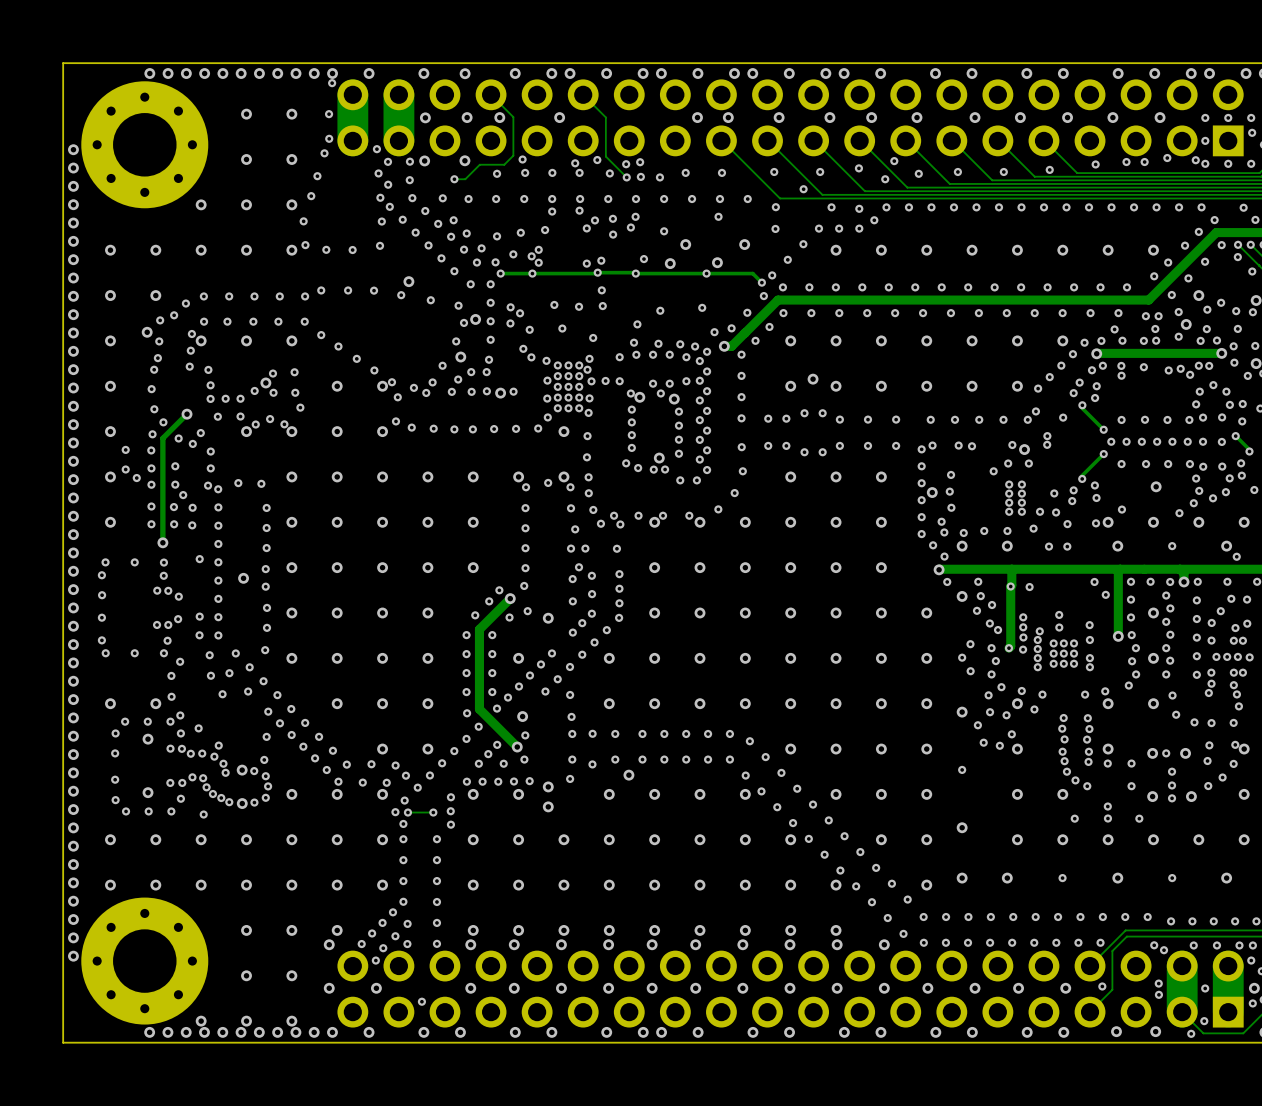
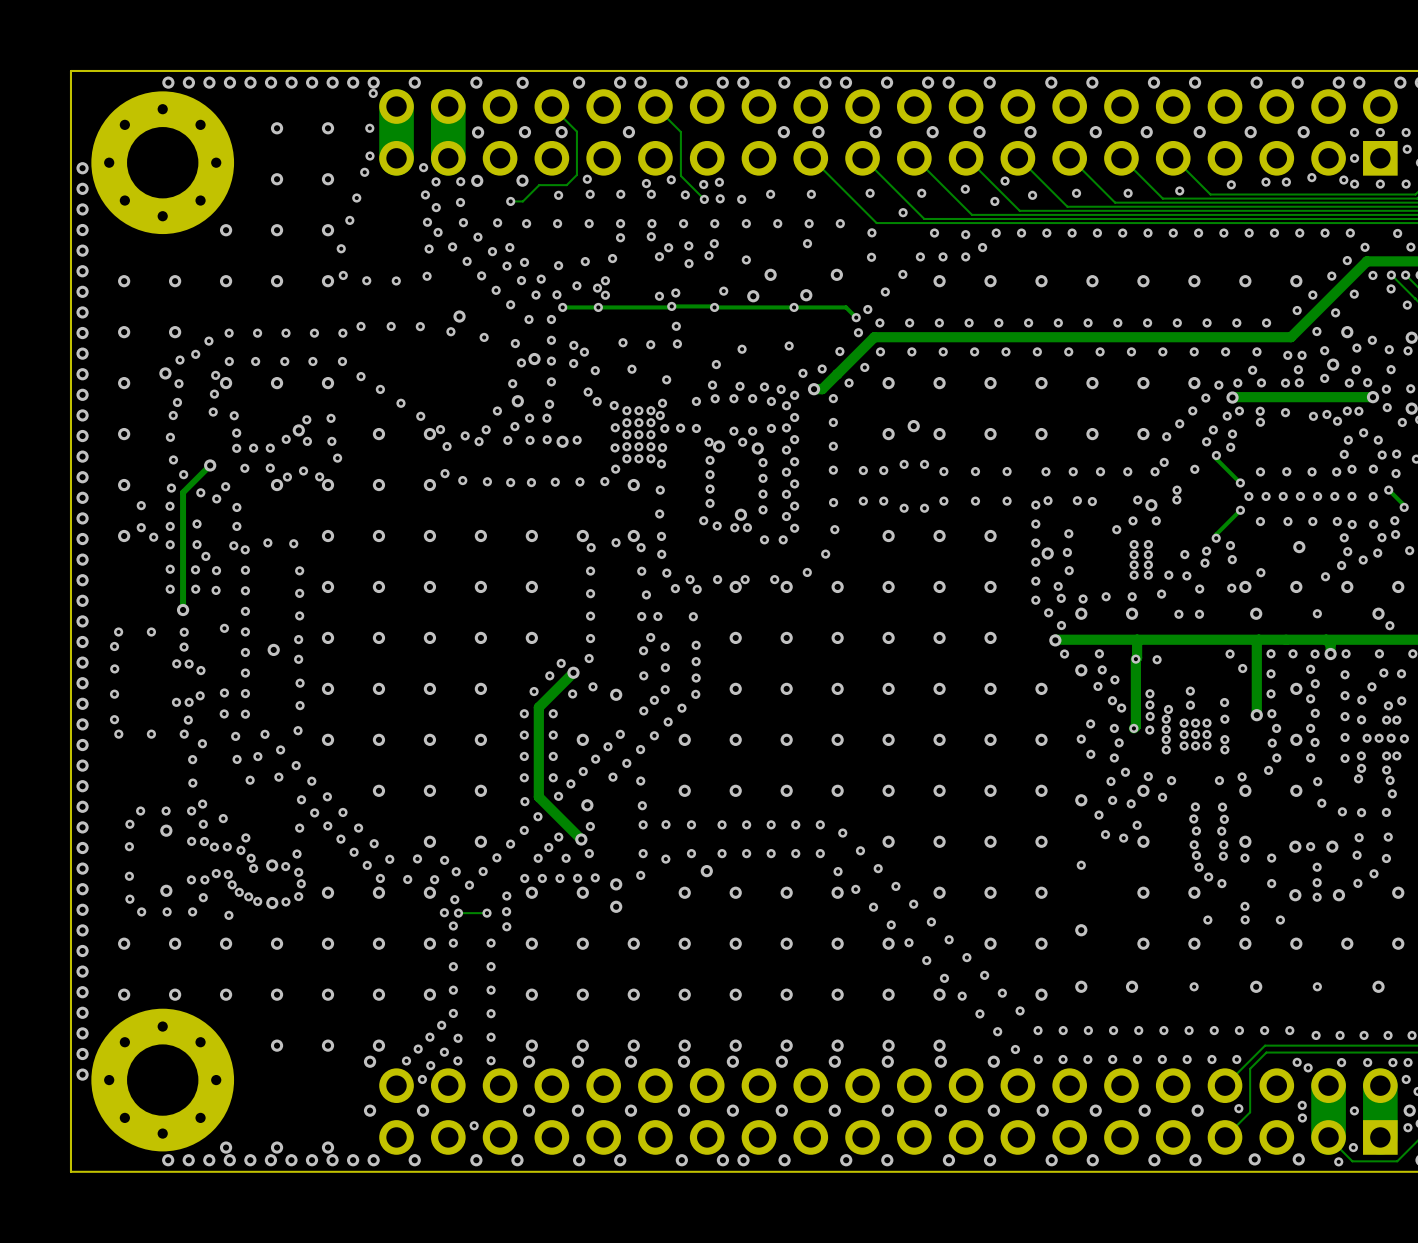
via: (110, 522) -> none
via: (110, 703) -> none
via: (155, 703) -> none
via: (1244, 749) -> none
via: (246, 975) -> none
via: (291, 975) -> none

